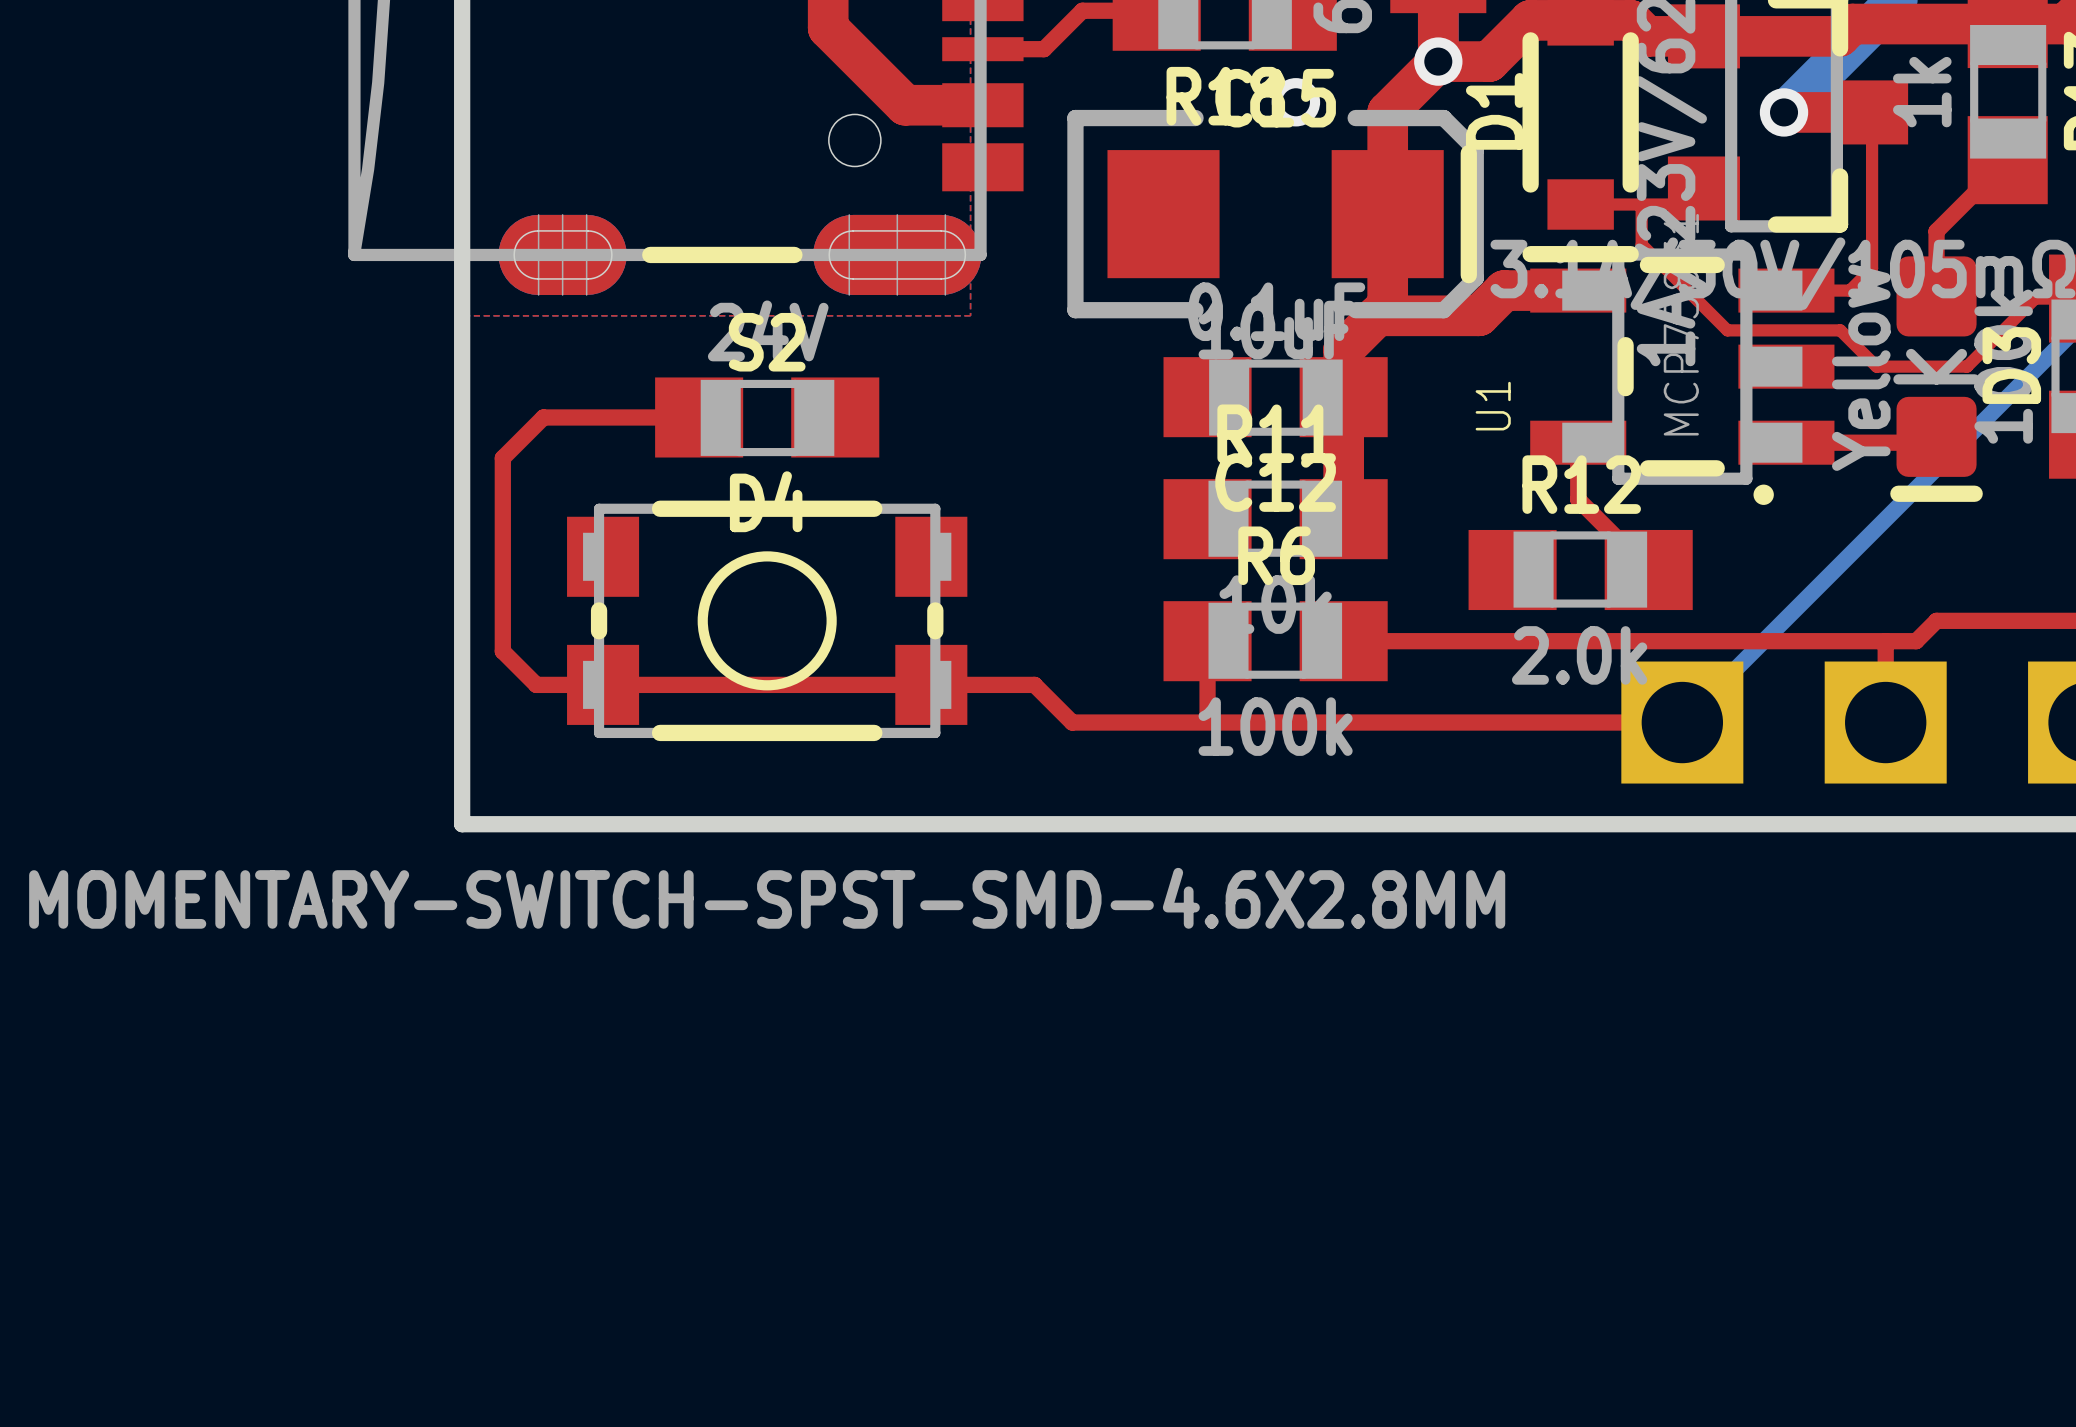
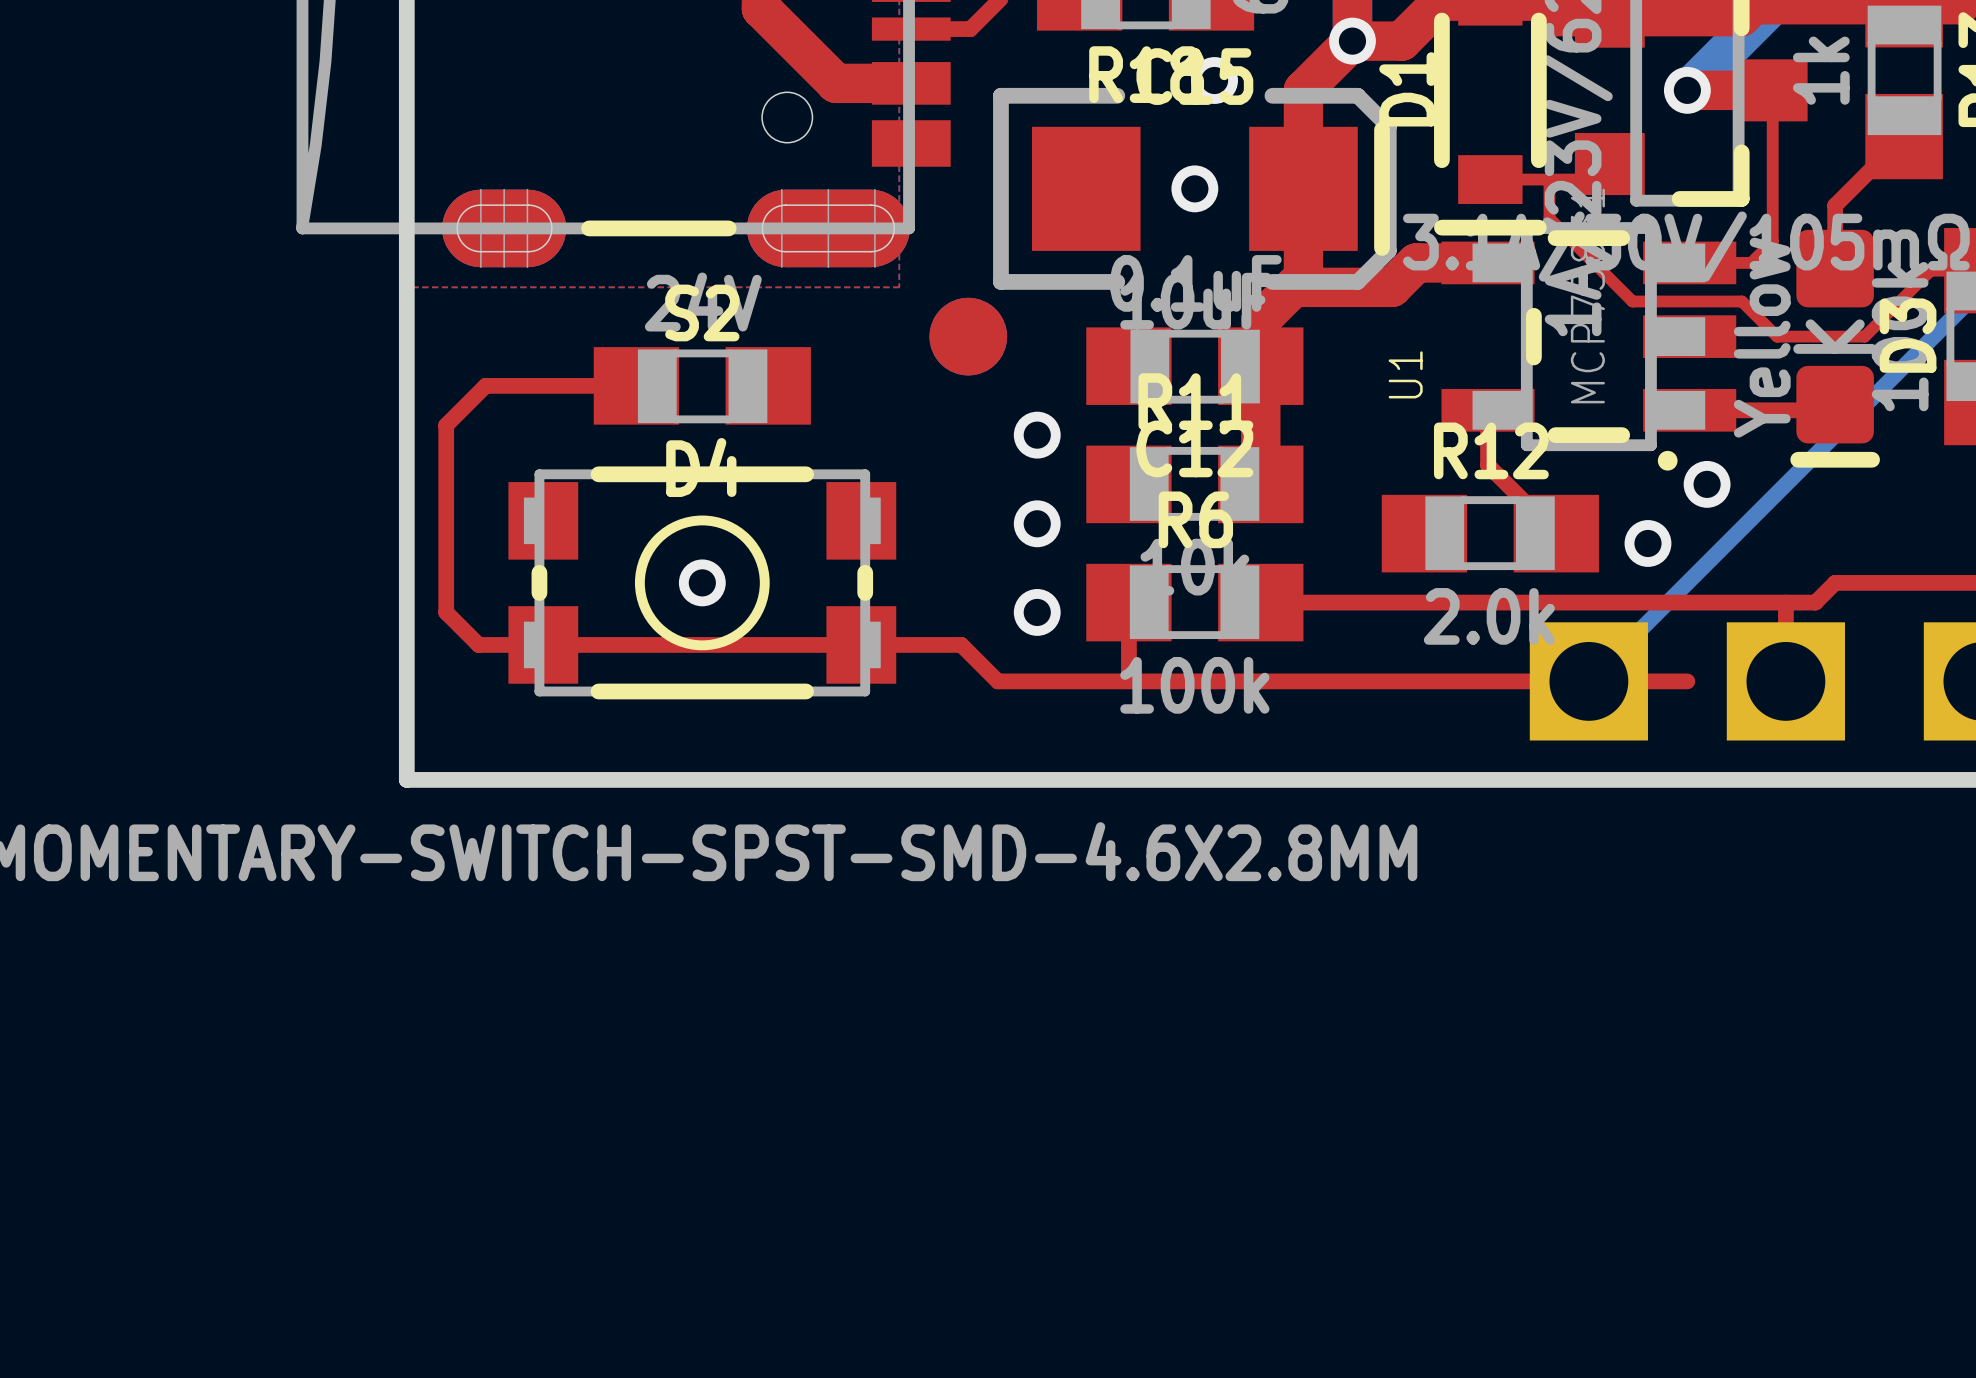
via: none -> (1194, 188)
part: none -> (968, 336)
via: none -> (1037, 435)
via: none -> (1707, 484)
via: none -> (1037, 523)
via: none -> (1647, 543)
via: none -> (702, 582)
via: none -> (1037, 612)
top track: none -> (1588, 681) (1687, 681)

